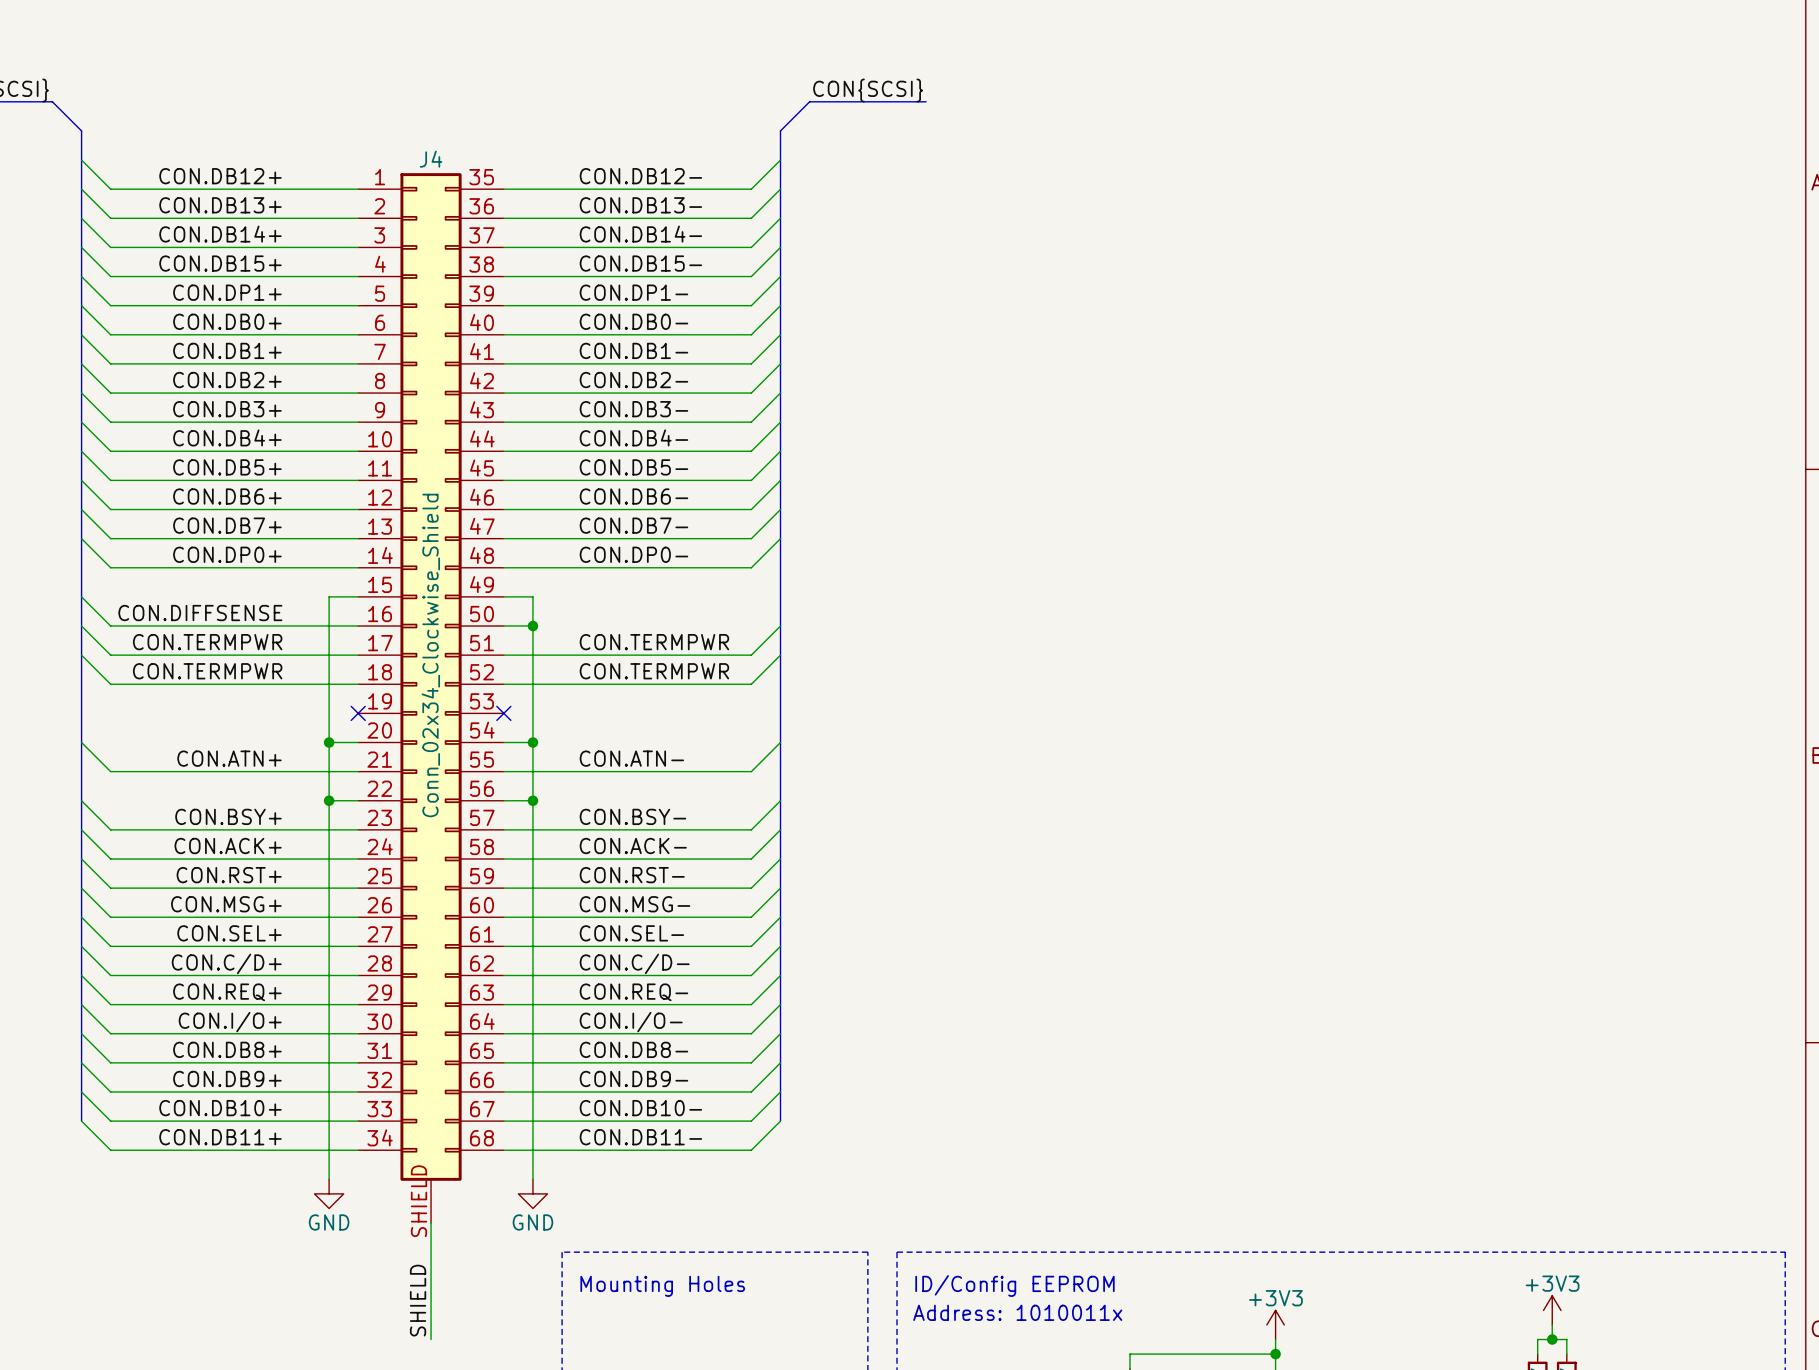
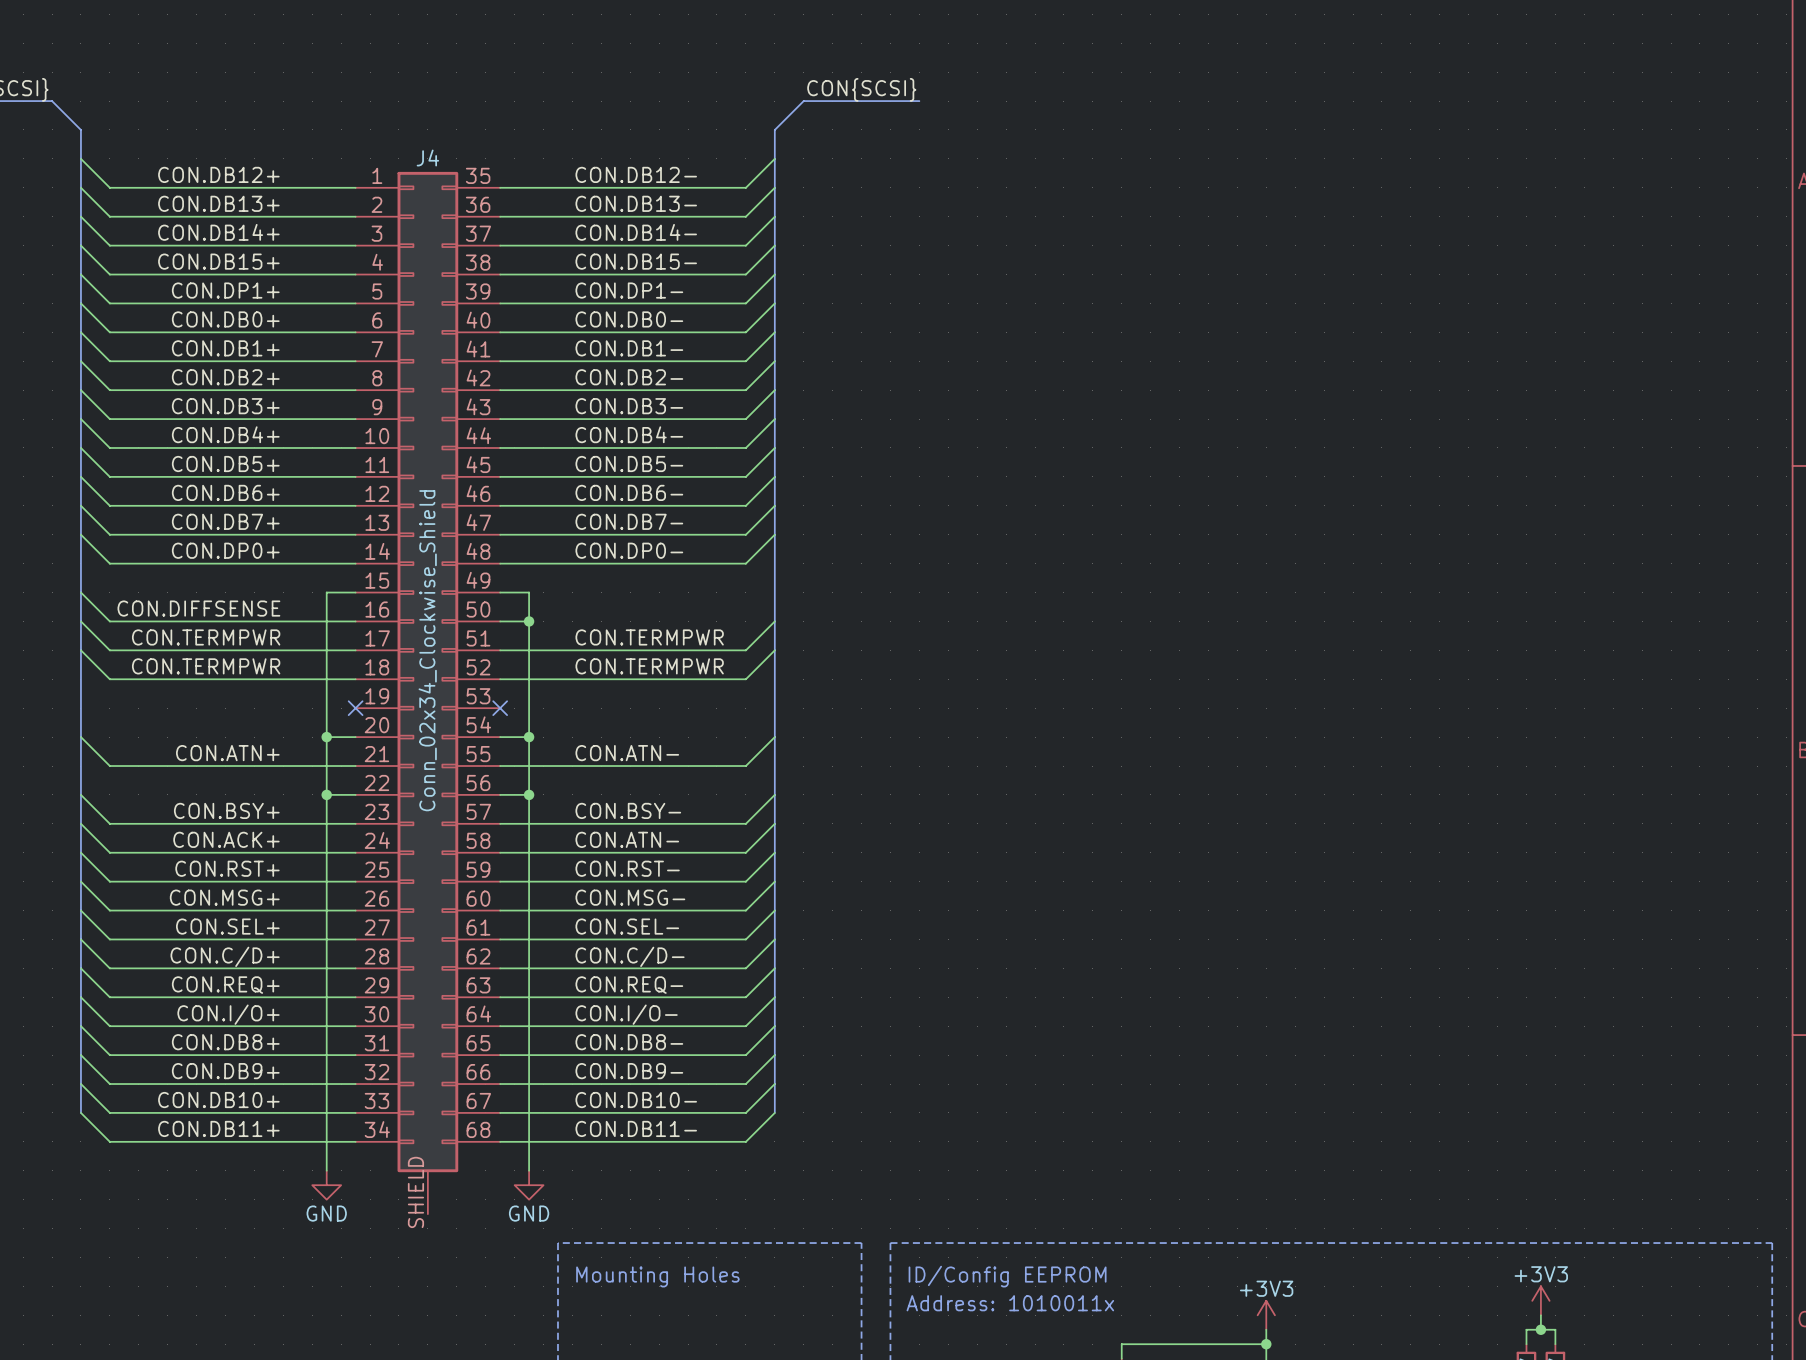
label: CON.ACK- (633, 846) -> CON.ATN- (627, 839)
wire: (431, 1223) (431, 1339) -> none
label: SHIELD (418, 1300) -> none

